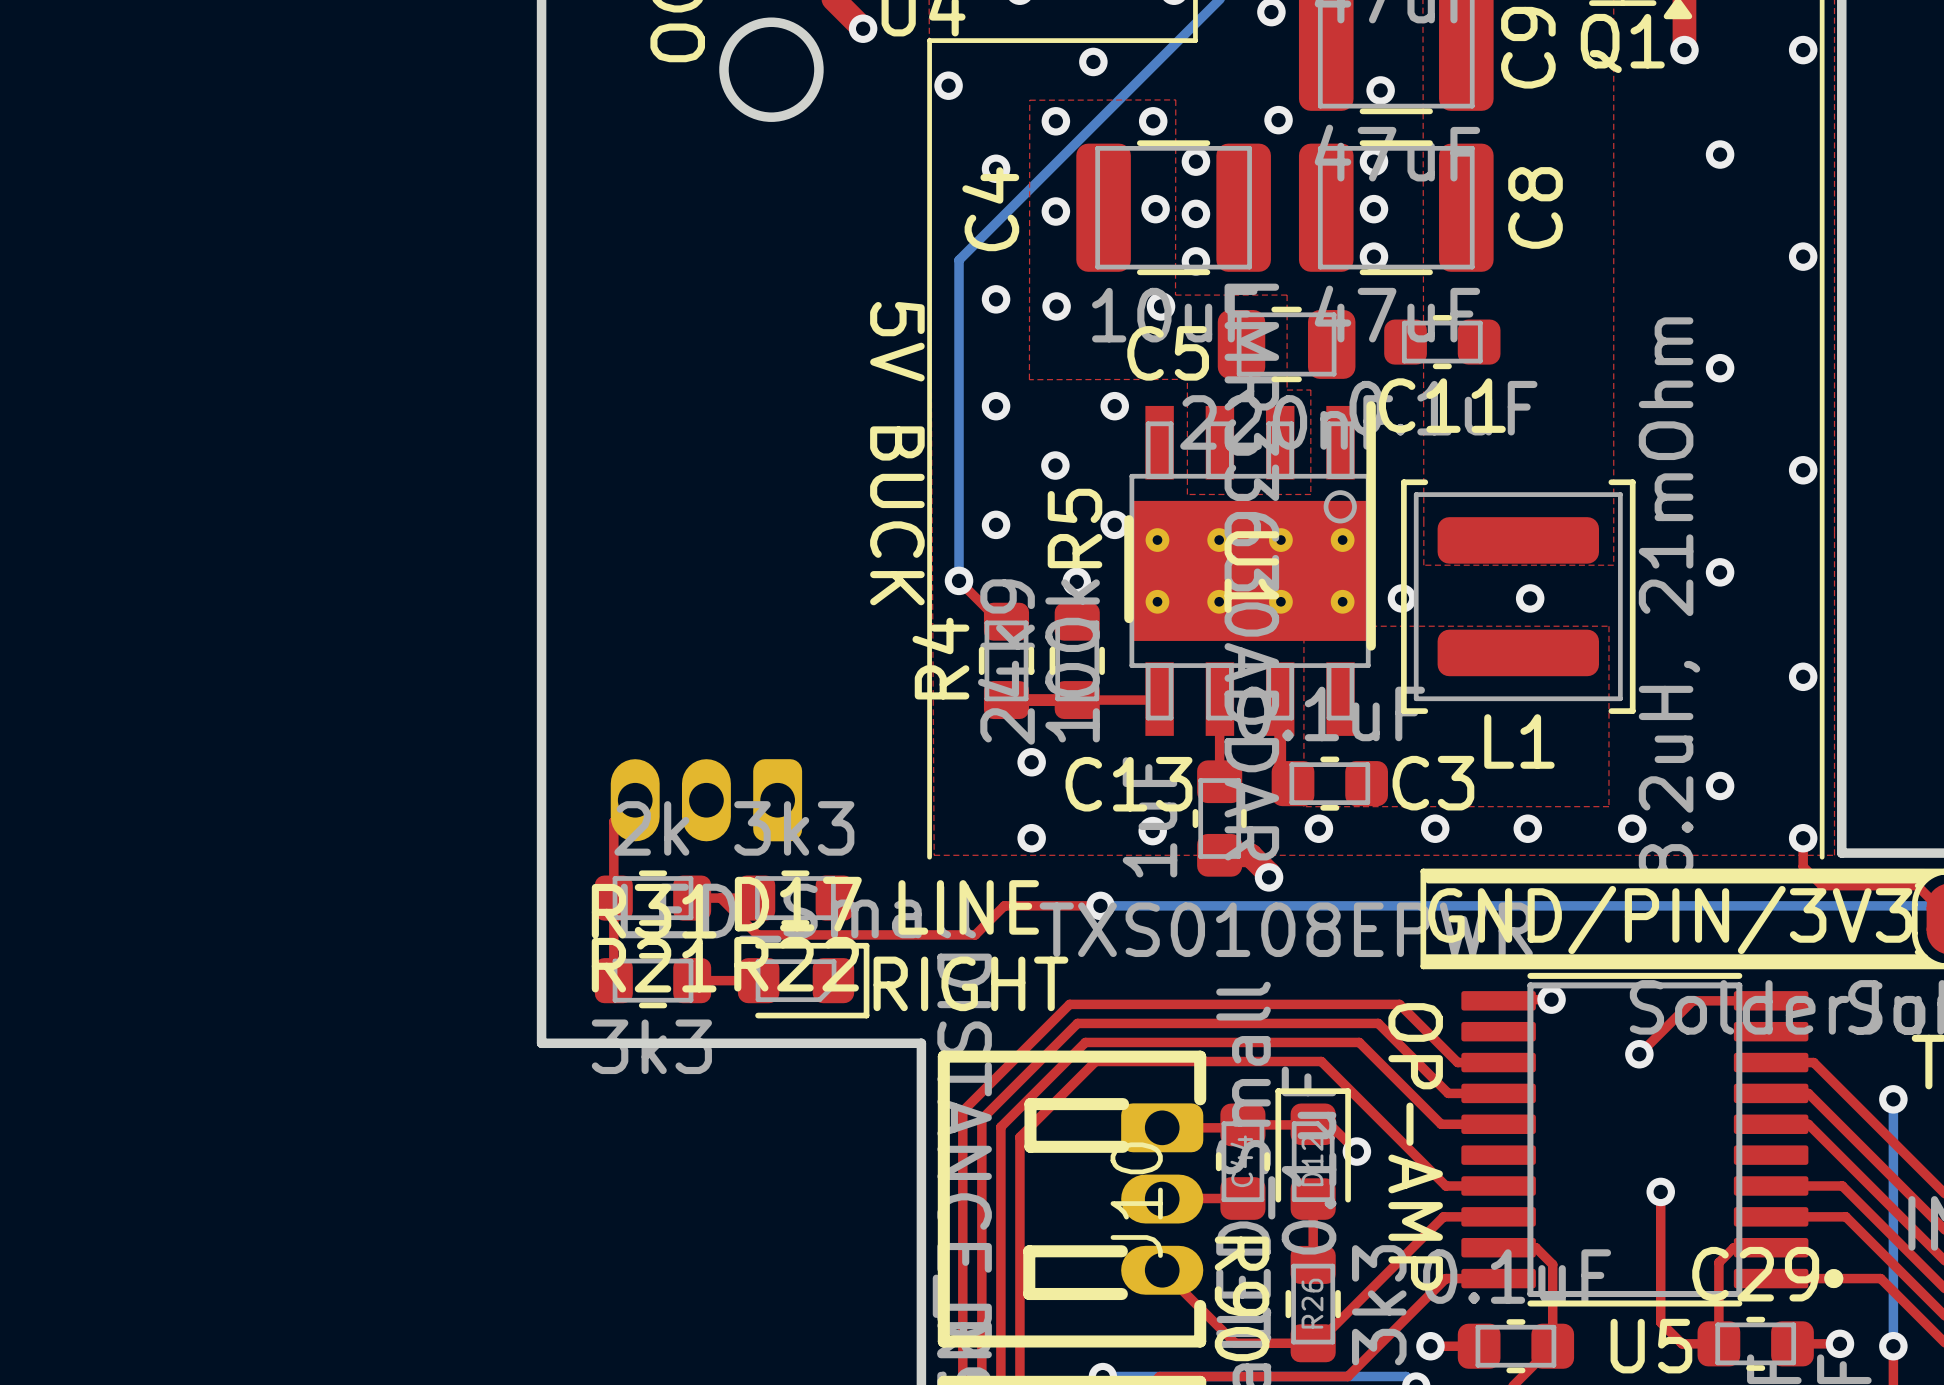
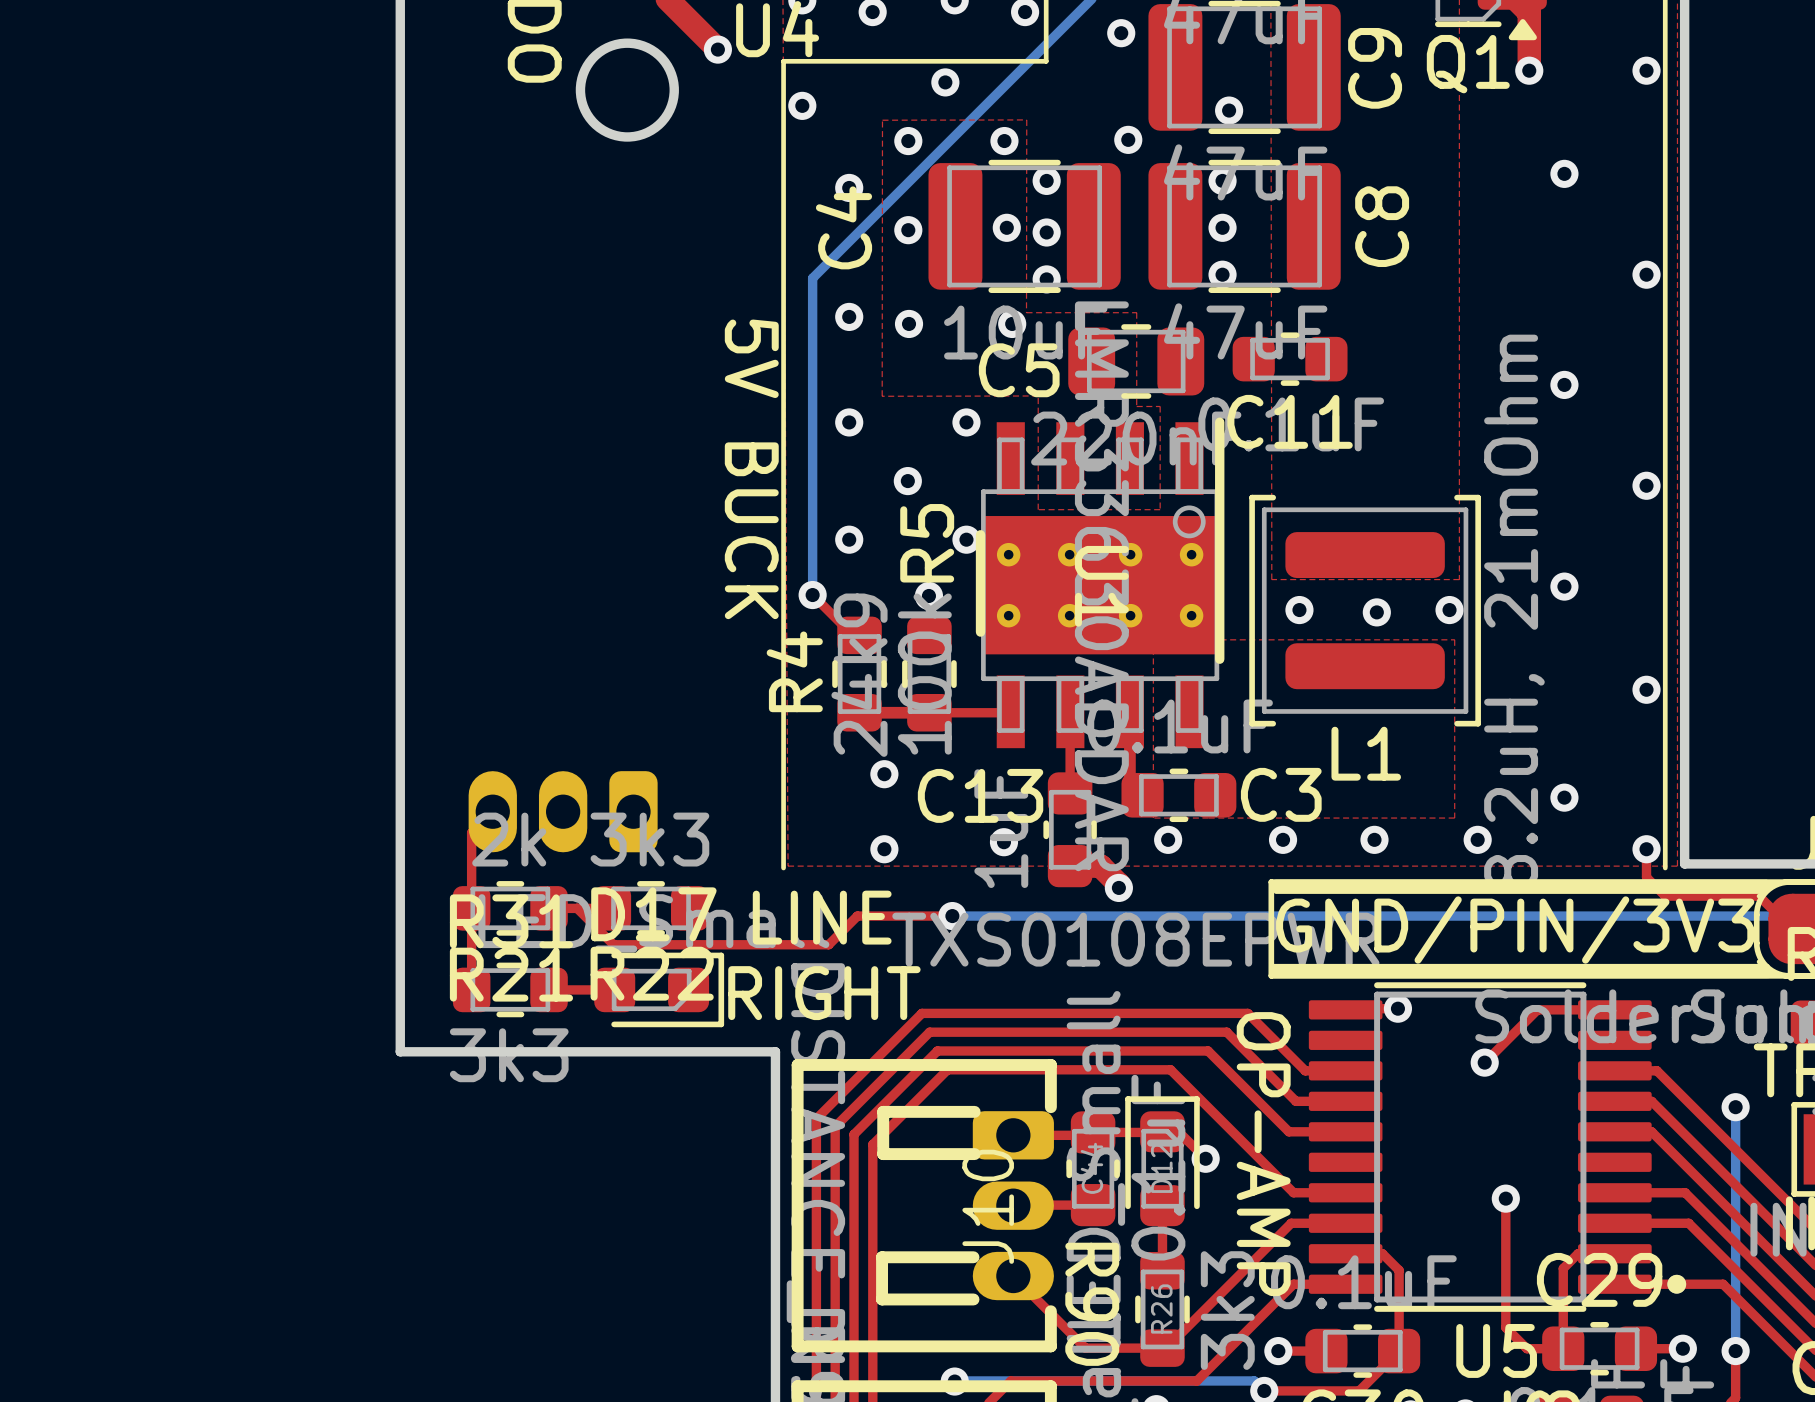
via: none -> (1449, 610)
via position: (1401, 598) -> (1299, 610)

